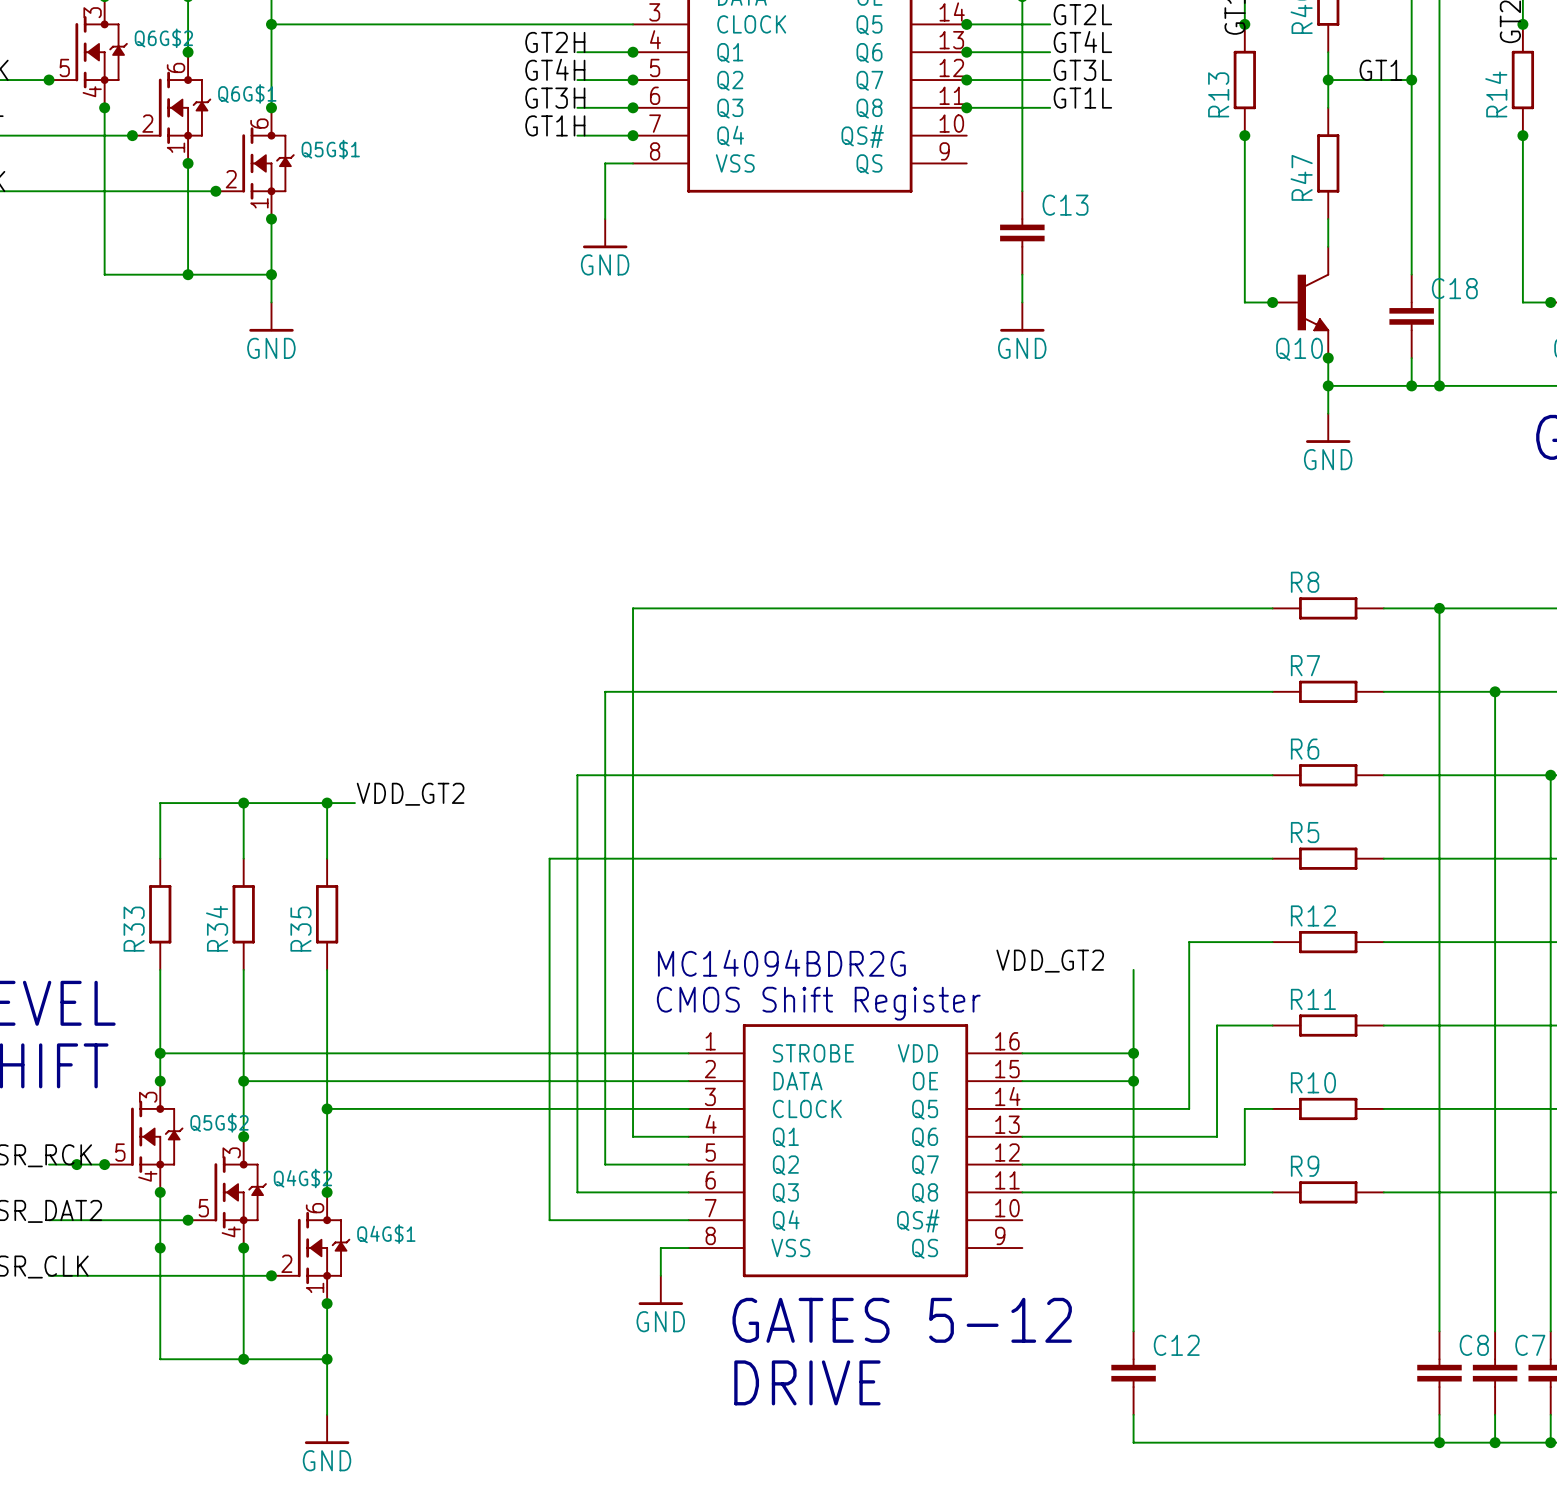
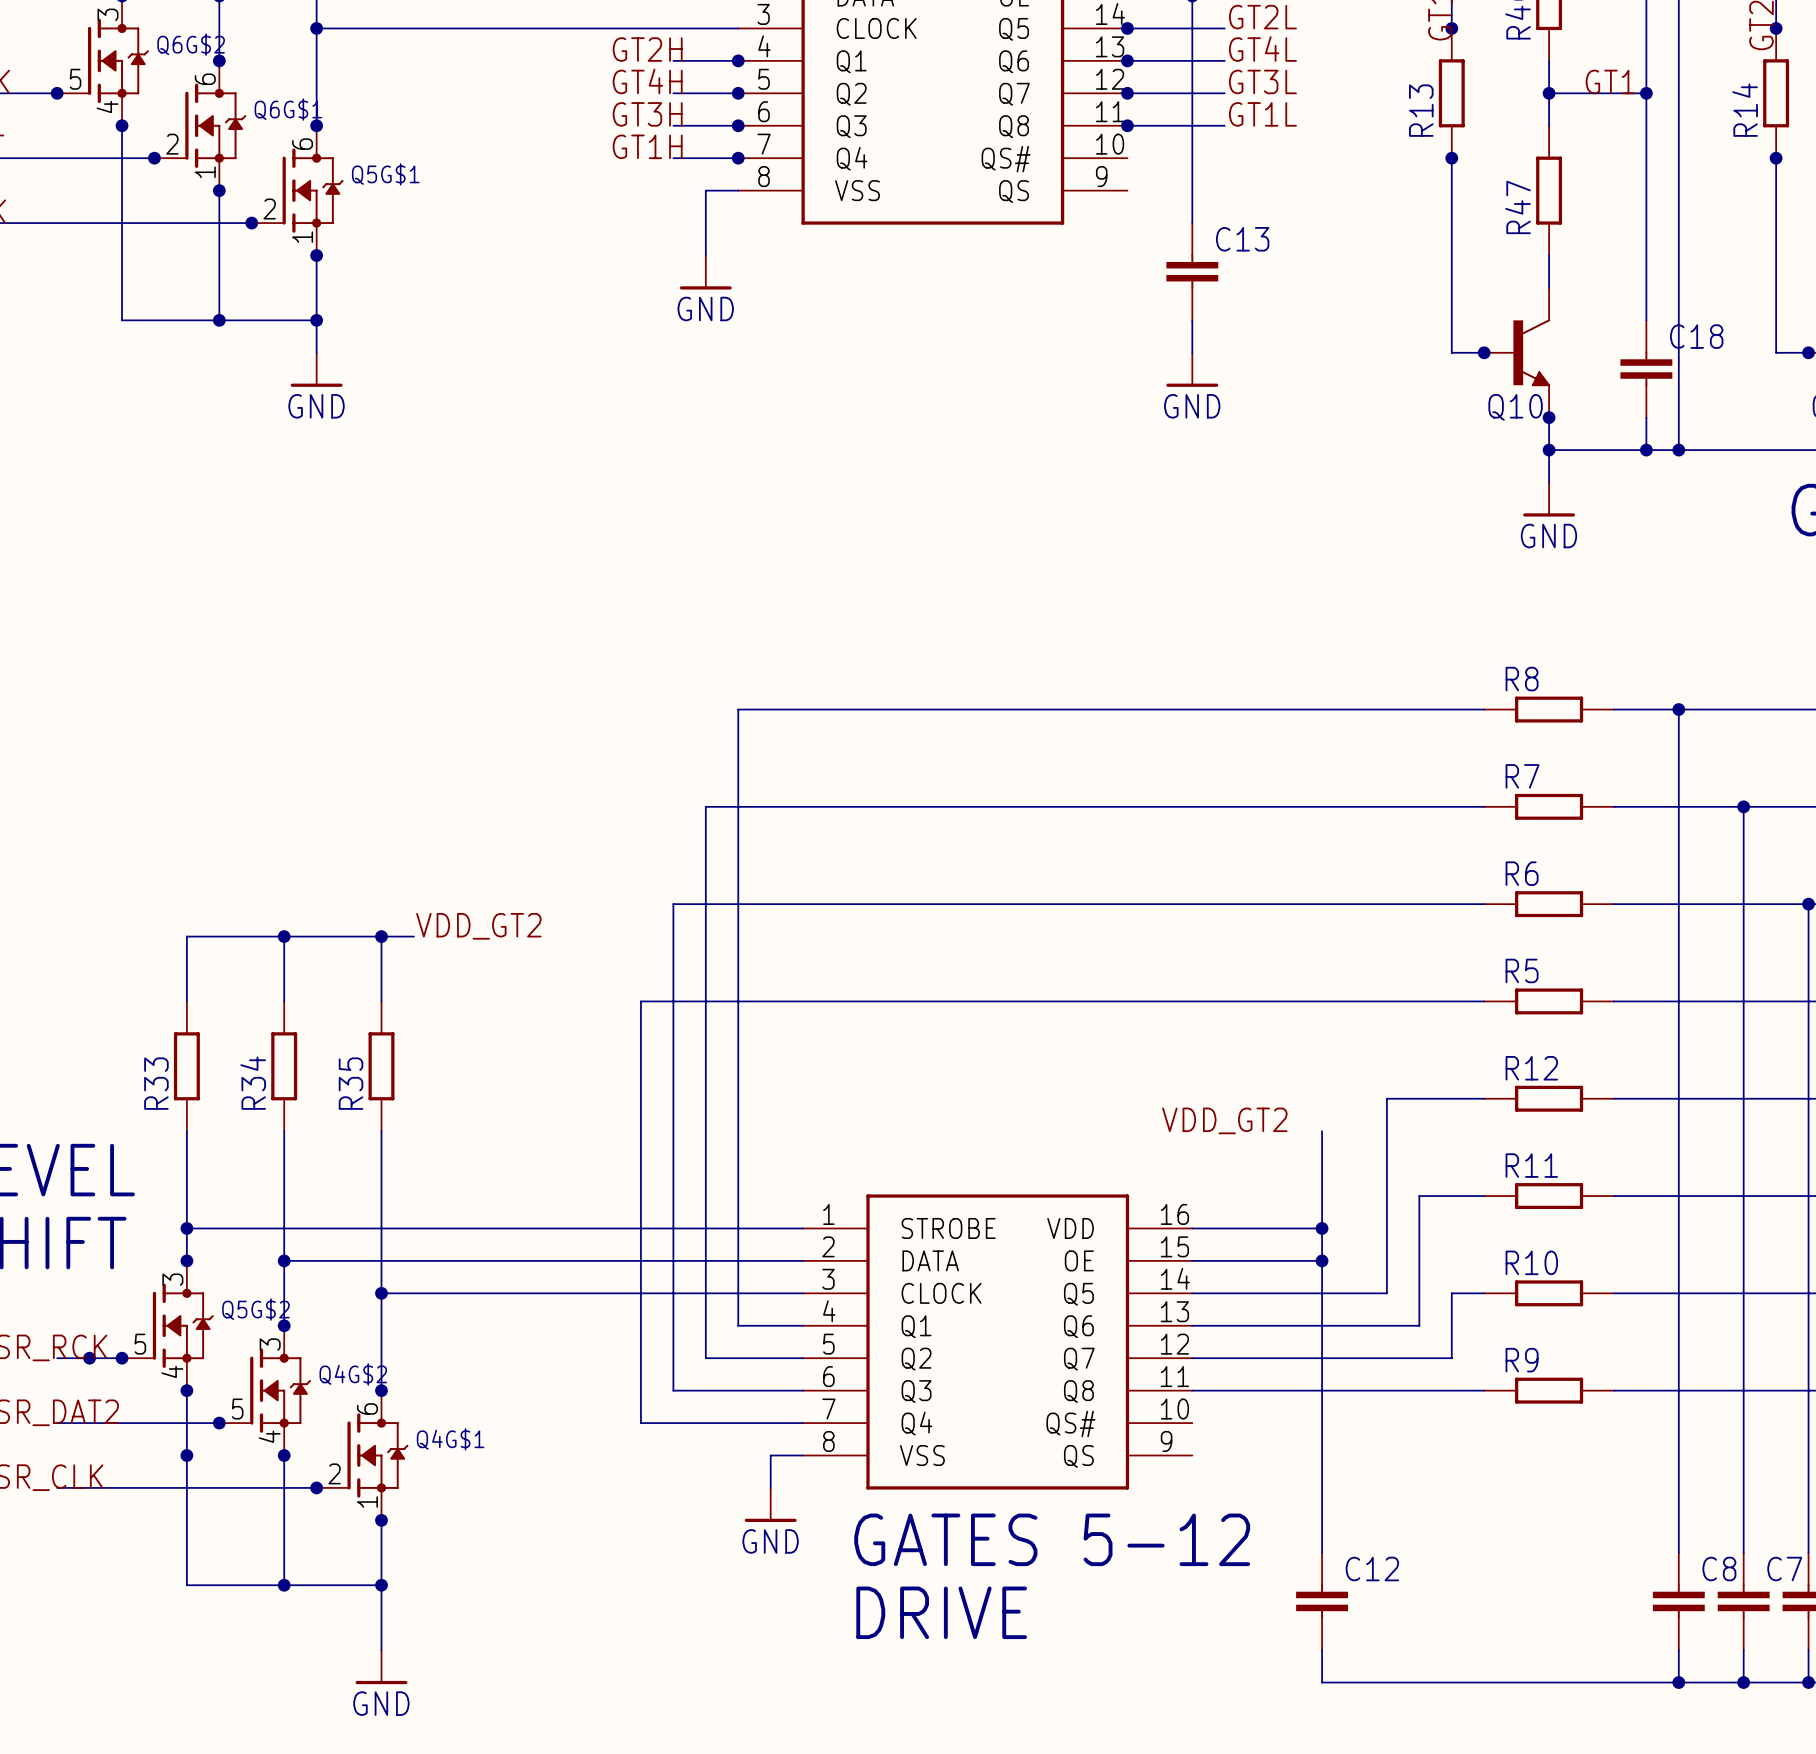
text: MC14094BDR2G (781, 963) -> none
text: CMOS Shift Register (818, 1003) -> none

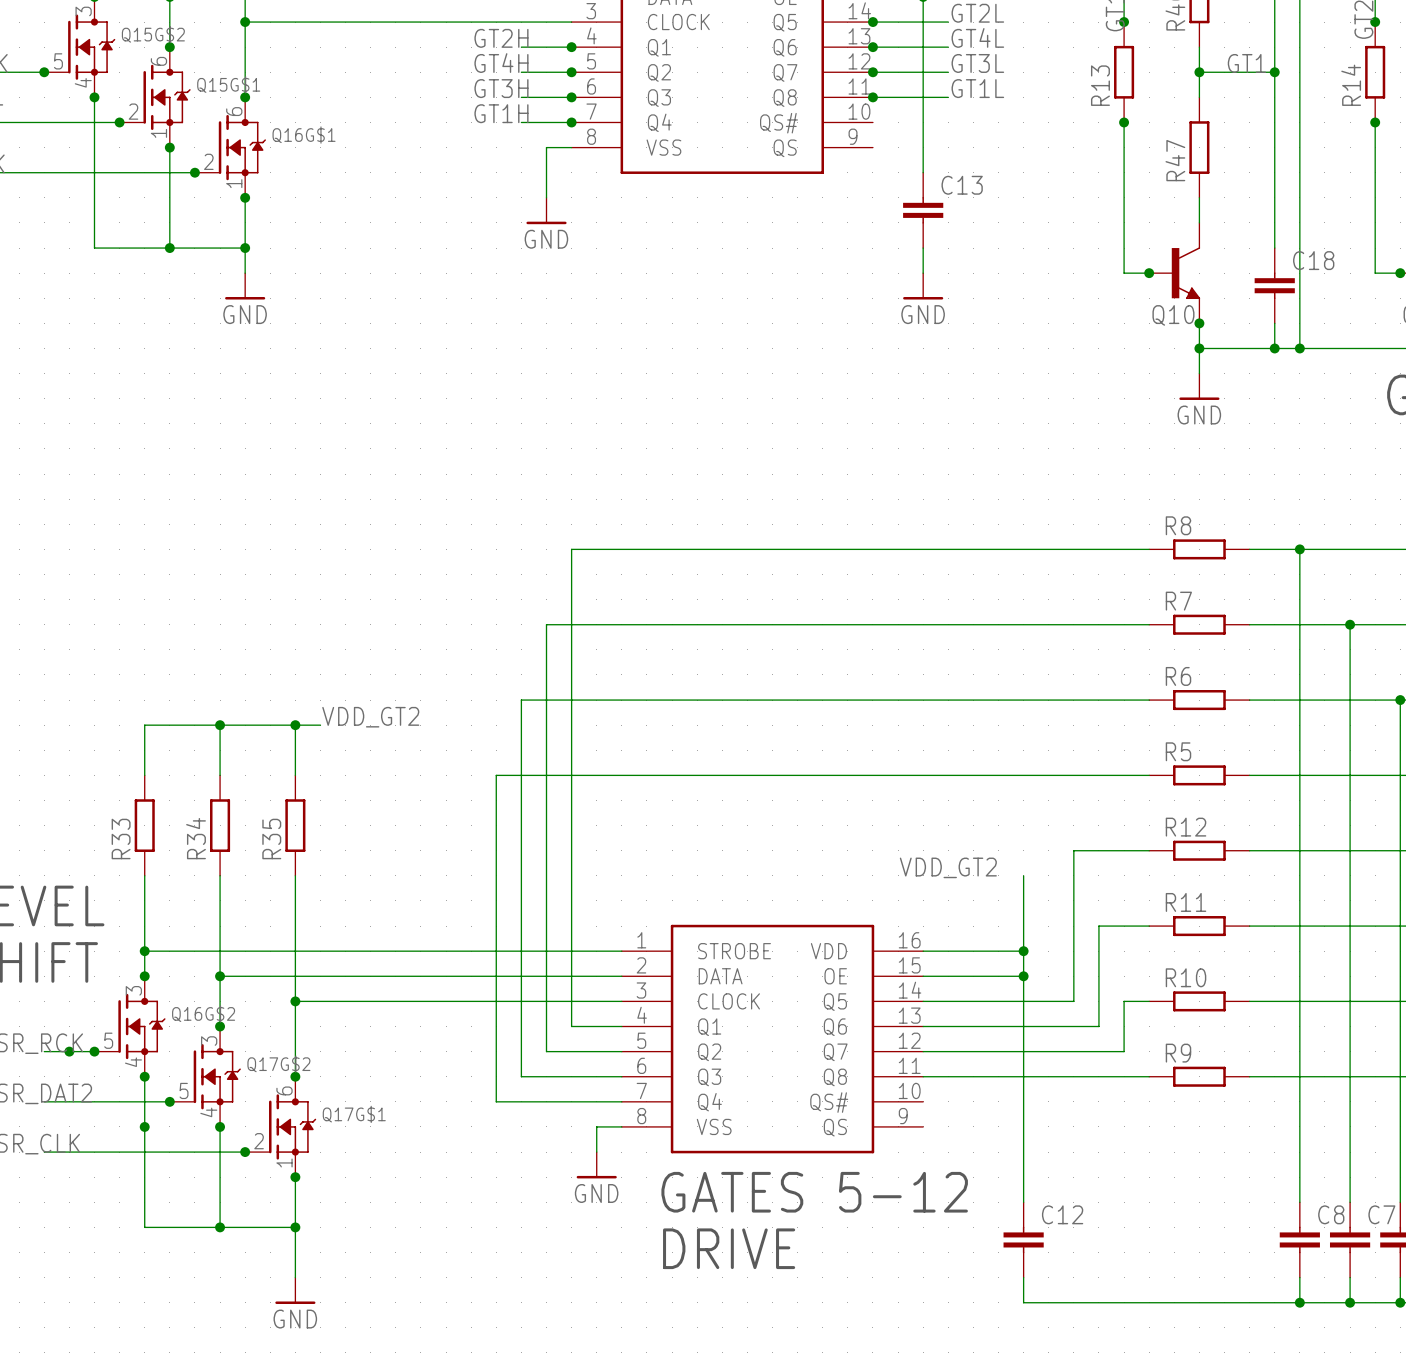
Q6G$2 name: Q6G$2 (191, 44) -> Q15G$2 (153, 34)
Q6G$1 name: Q6G$1 (288, 109) -> Q15G$1 (228, 84)
Q5G$1 name: Q5G$1 (385, 174) -> Q16G$1 (304, 135)
Q5G$2 name: Q5G$2 (255, 1309) -> Q16G$2 (203, 1013)
Q4G$2 name: Q4G$2 (353, 1374) -> Q17G$2 (278, 1064)
Q4G$1 name: Q4G$1 (450, 1439) -> Q17G$1 (354, 1114)

